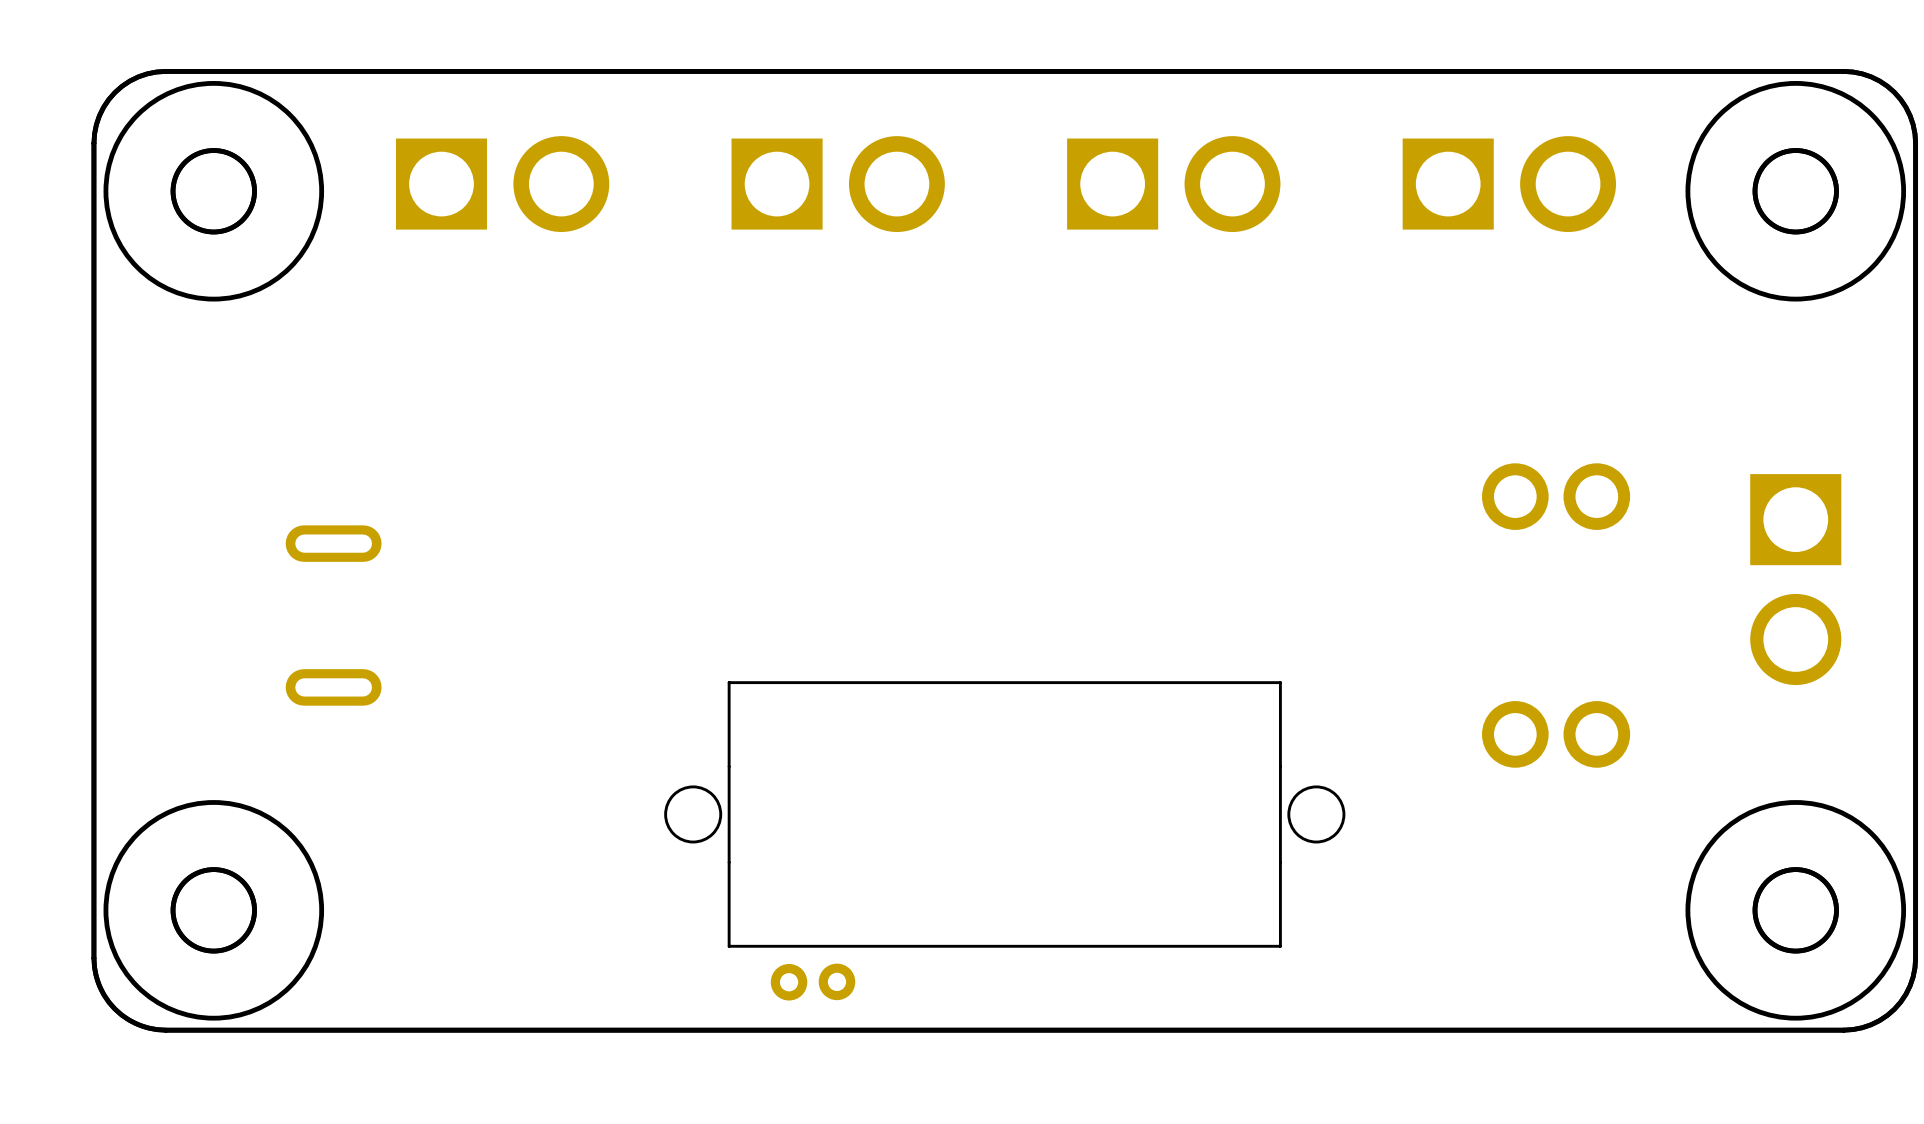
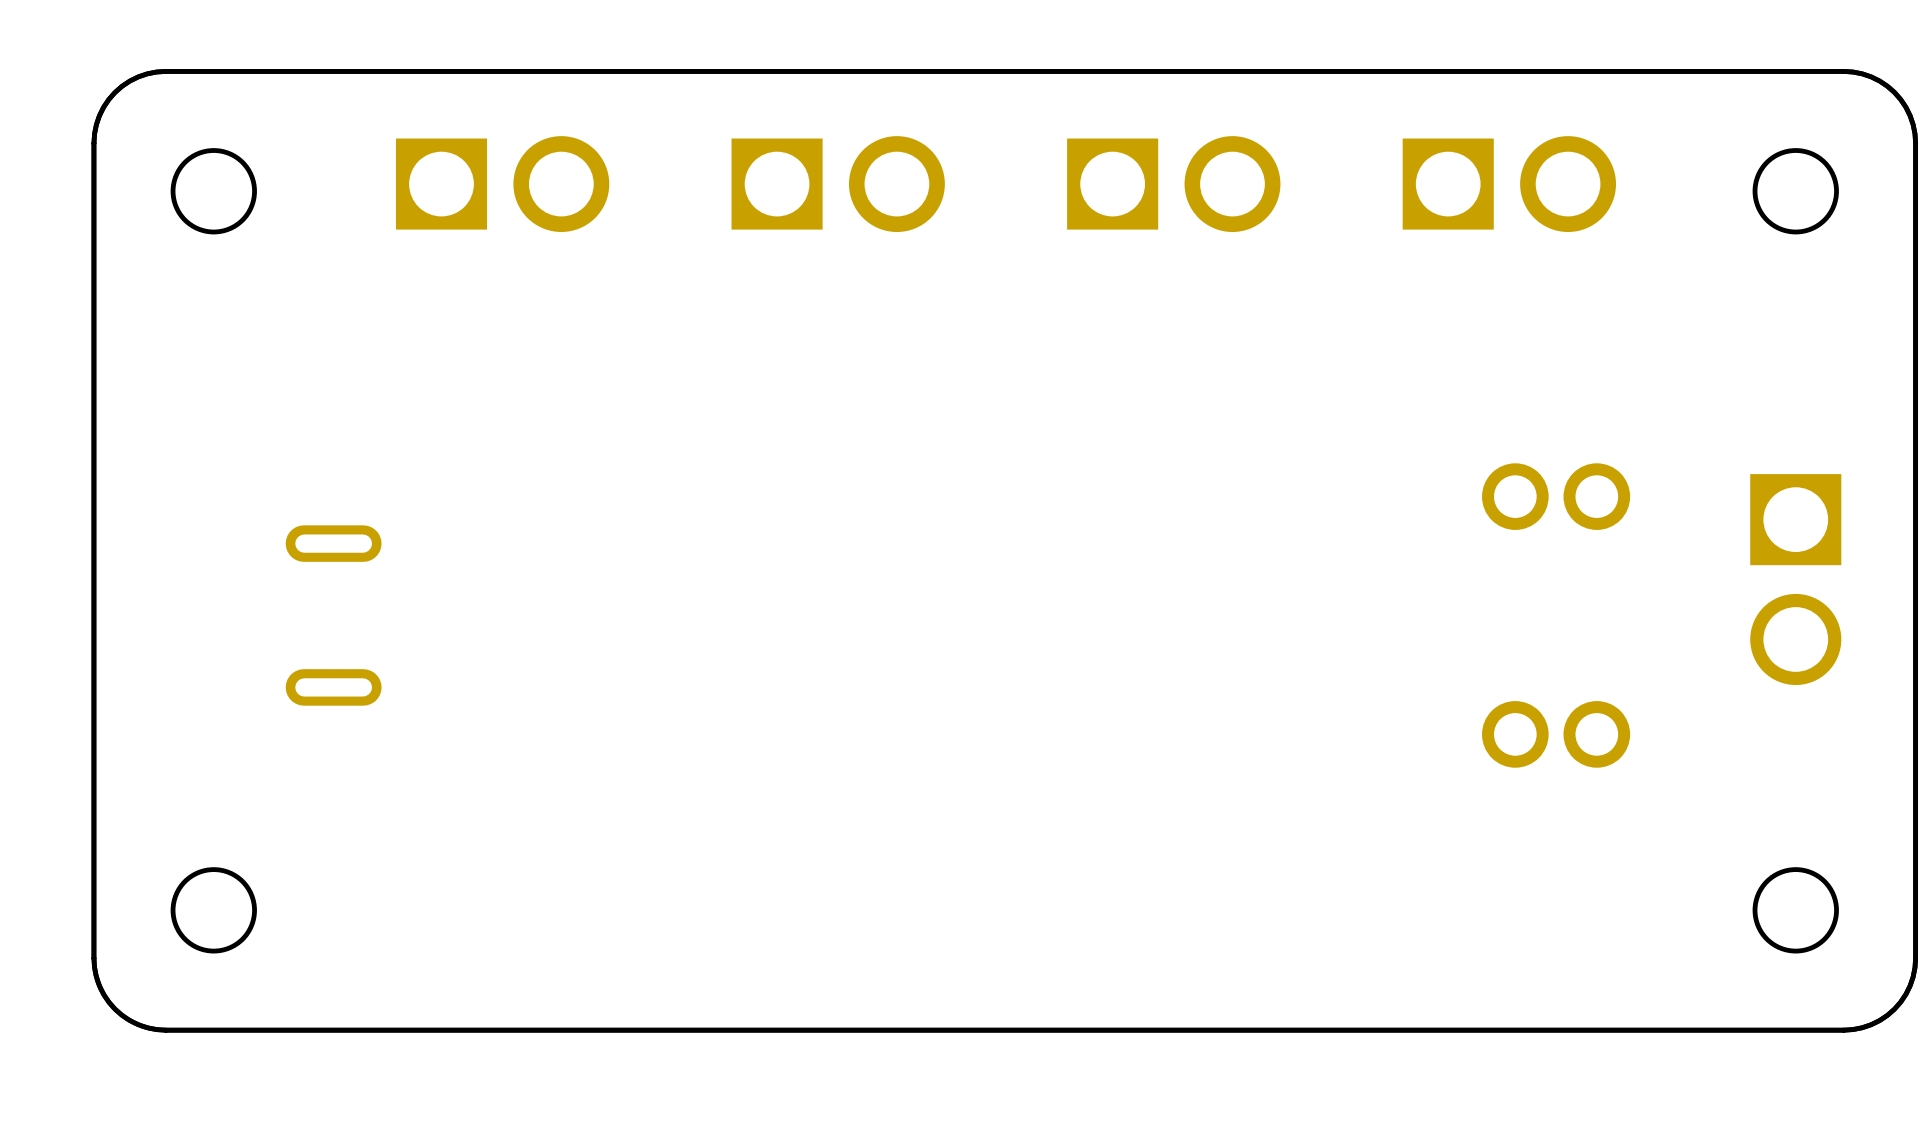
drawing: [103, 81, 325, 302] -> none
drawing: [1685, 81, 1907, 302] -> none
drawing: [103, 800, 325, 1021] -> none
drawing: [1685, 800, 1907, 1021] -> none
part: (1004, 840) -> none

